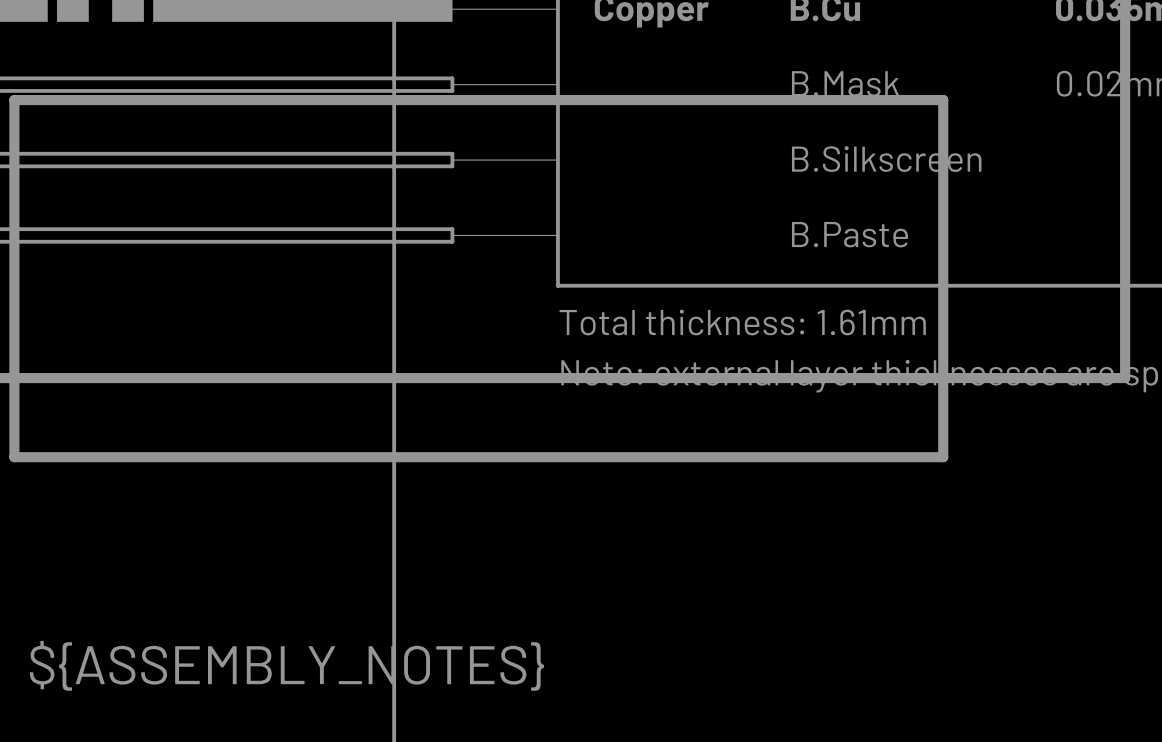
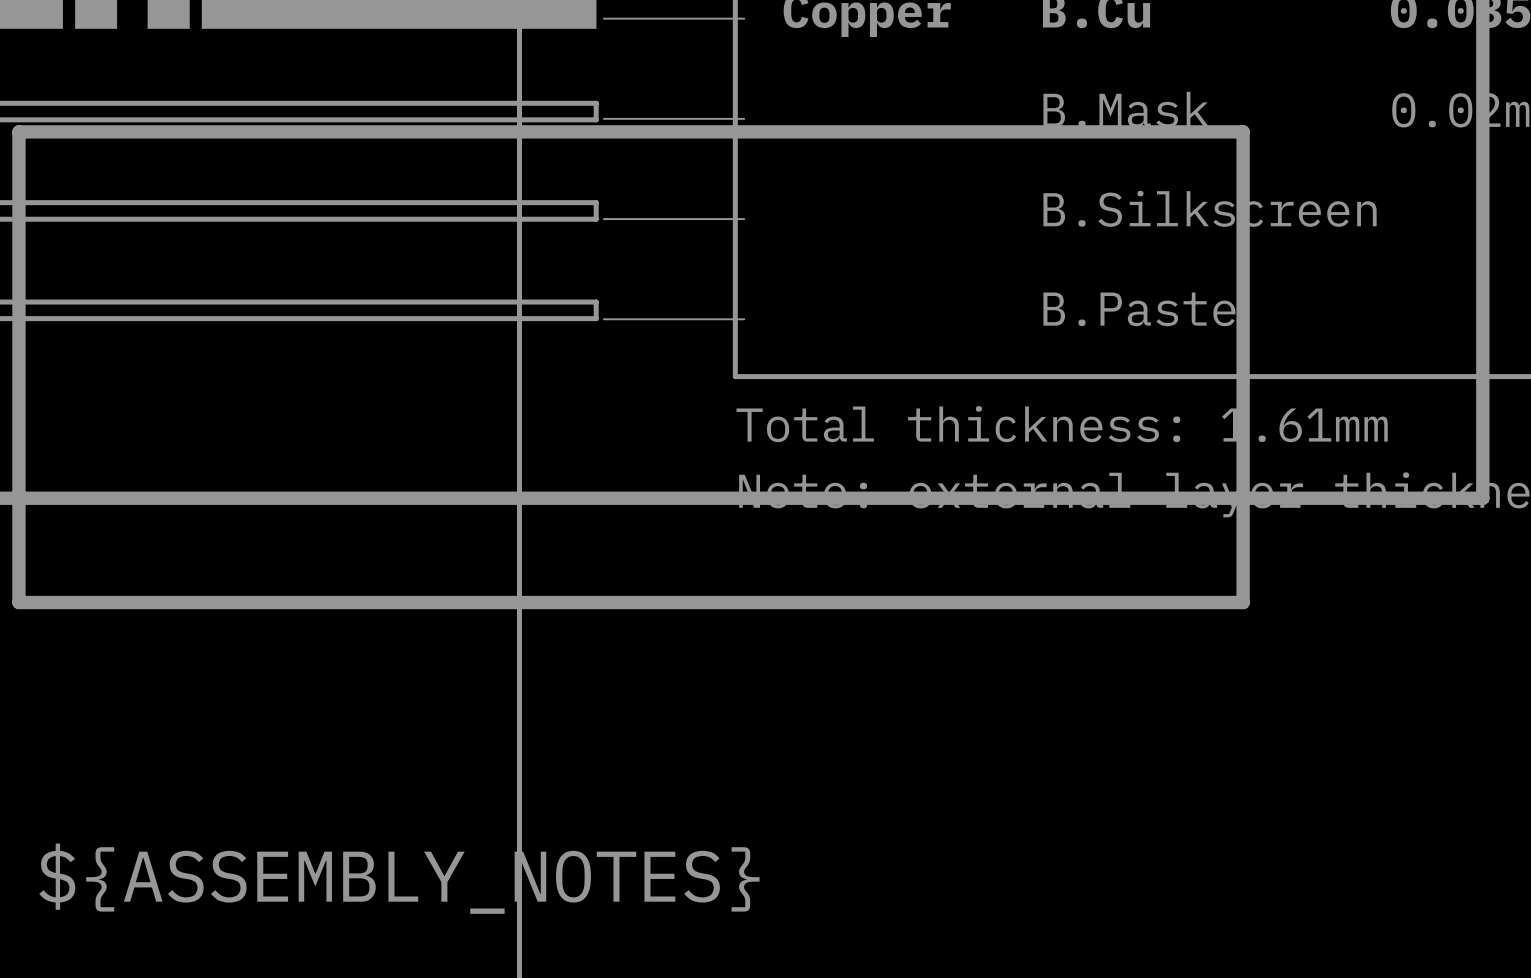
line: (452, 9) (557, 9) -> none
line: none -> (603, 18) (744, 18)
line: (452, 84) (557, 84) -> none
line: none -> (603, 118) (744, 118)
line: (452, 160) (557, 160) -> none
line: none -> (603, 219) (744, 219)
line: (452, 235) (557, 235) -> none
line: none -> (603, 319) (744, 319)

